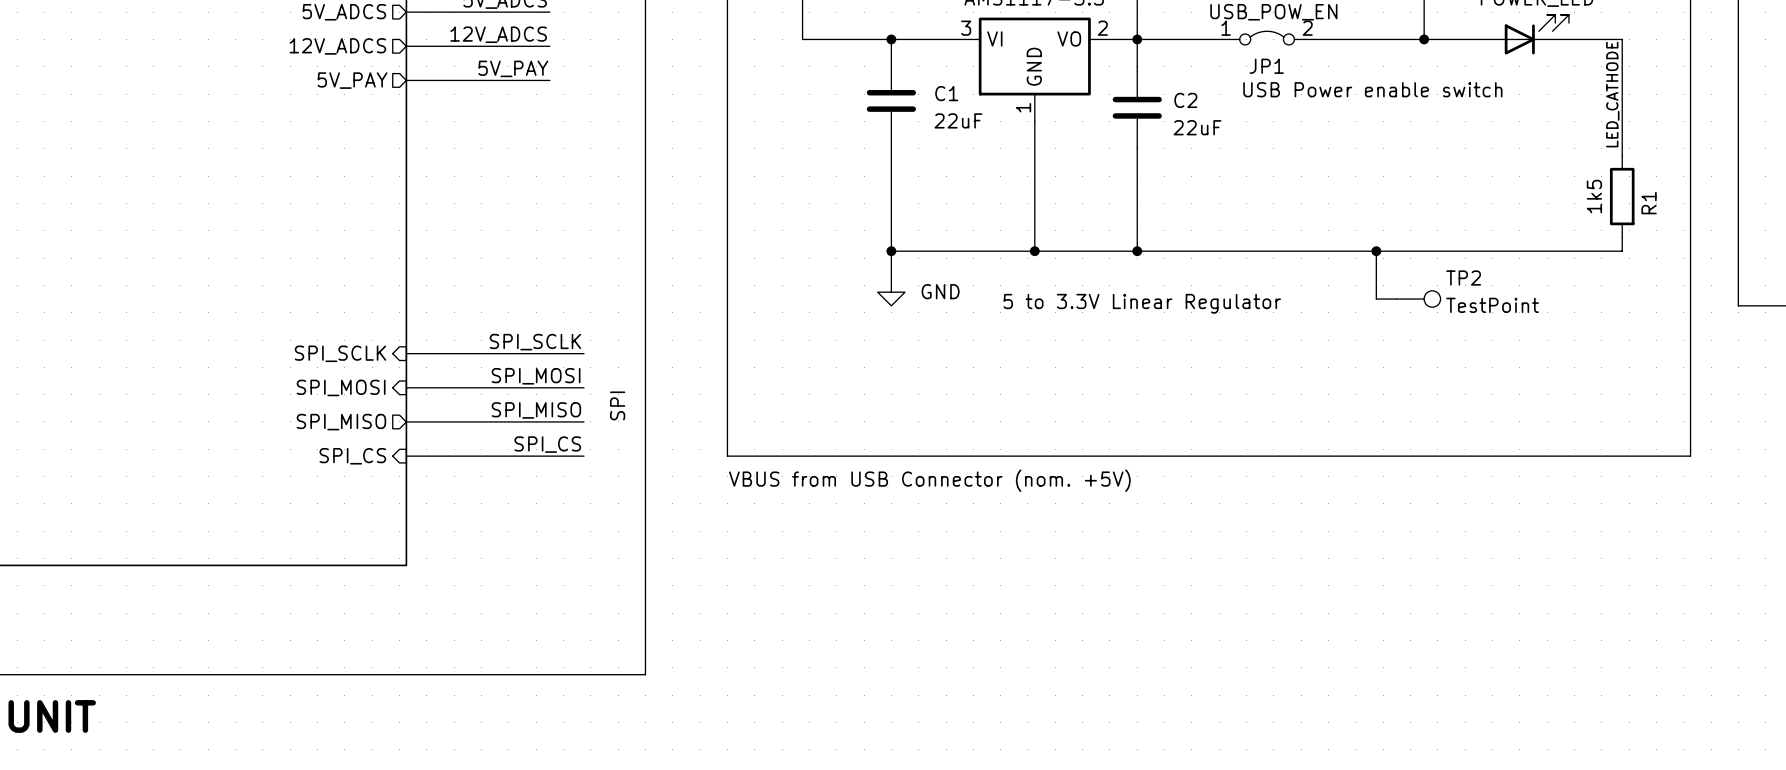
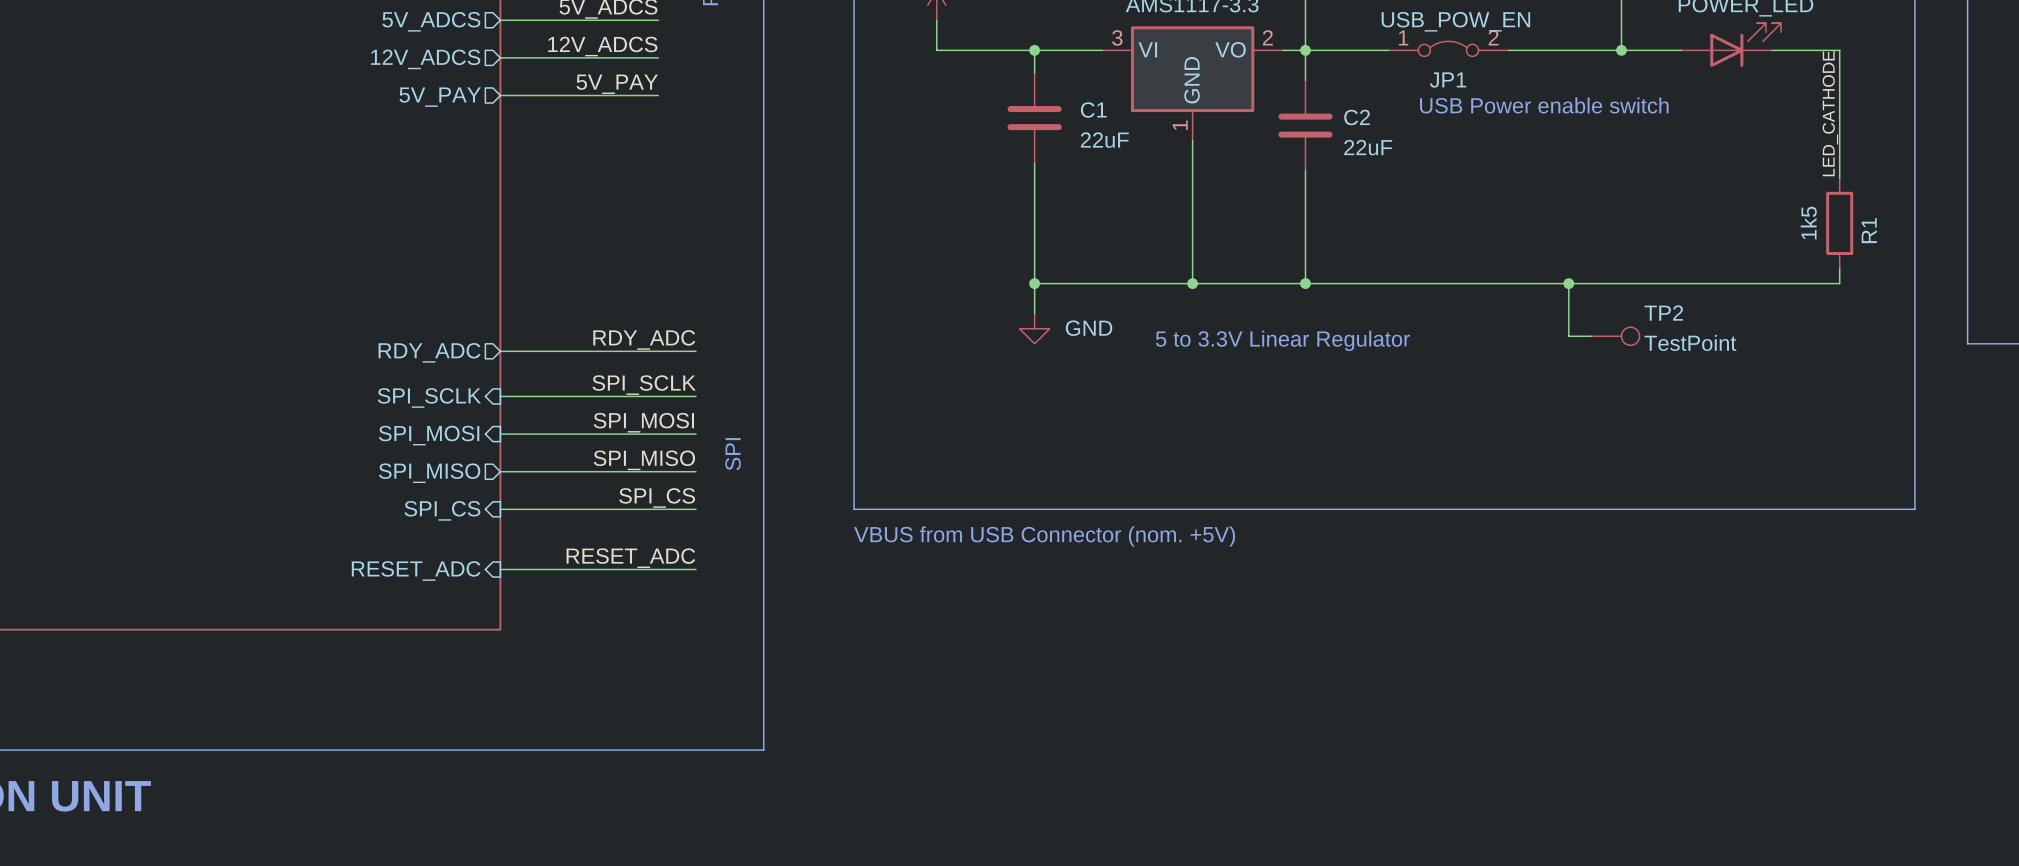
label: none -> RDY_ADC (644, 339)
sheet pin: none -> RDY_ADC (429, 352)
wire: none -> (500, 351) (696, 351)
label: none -> RESET_ADC (630, 558)
sheet pin: none -> RESET_ADC (416, 571)
wire: none -> (500, 569) (696, 569)

